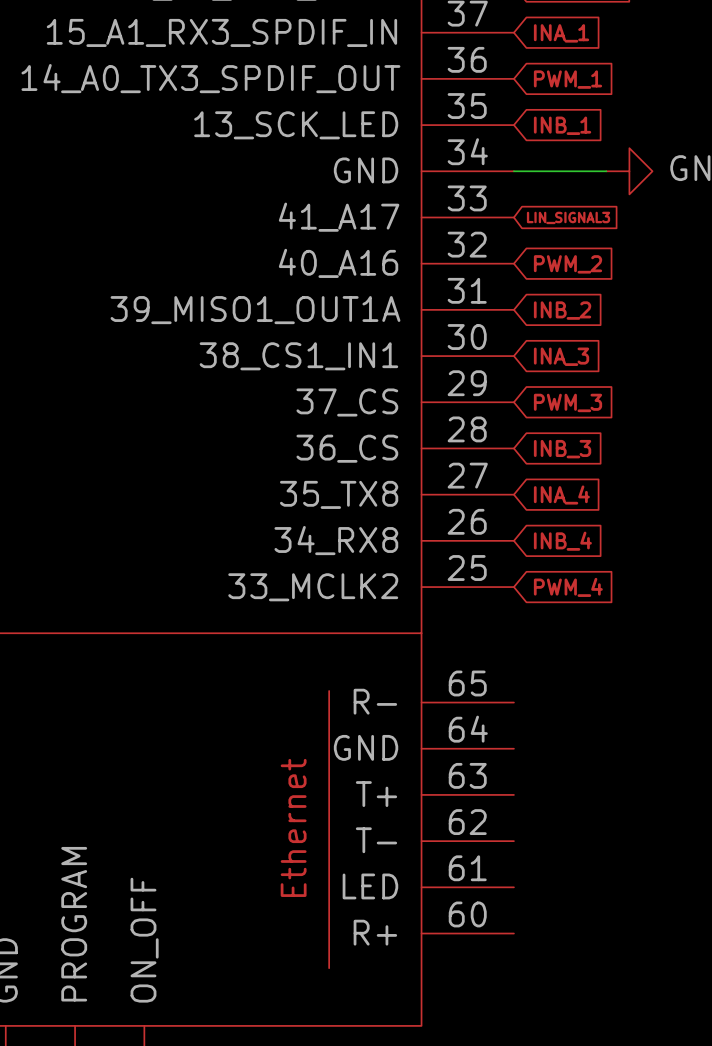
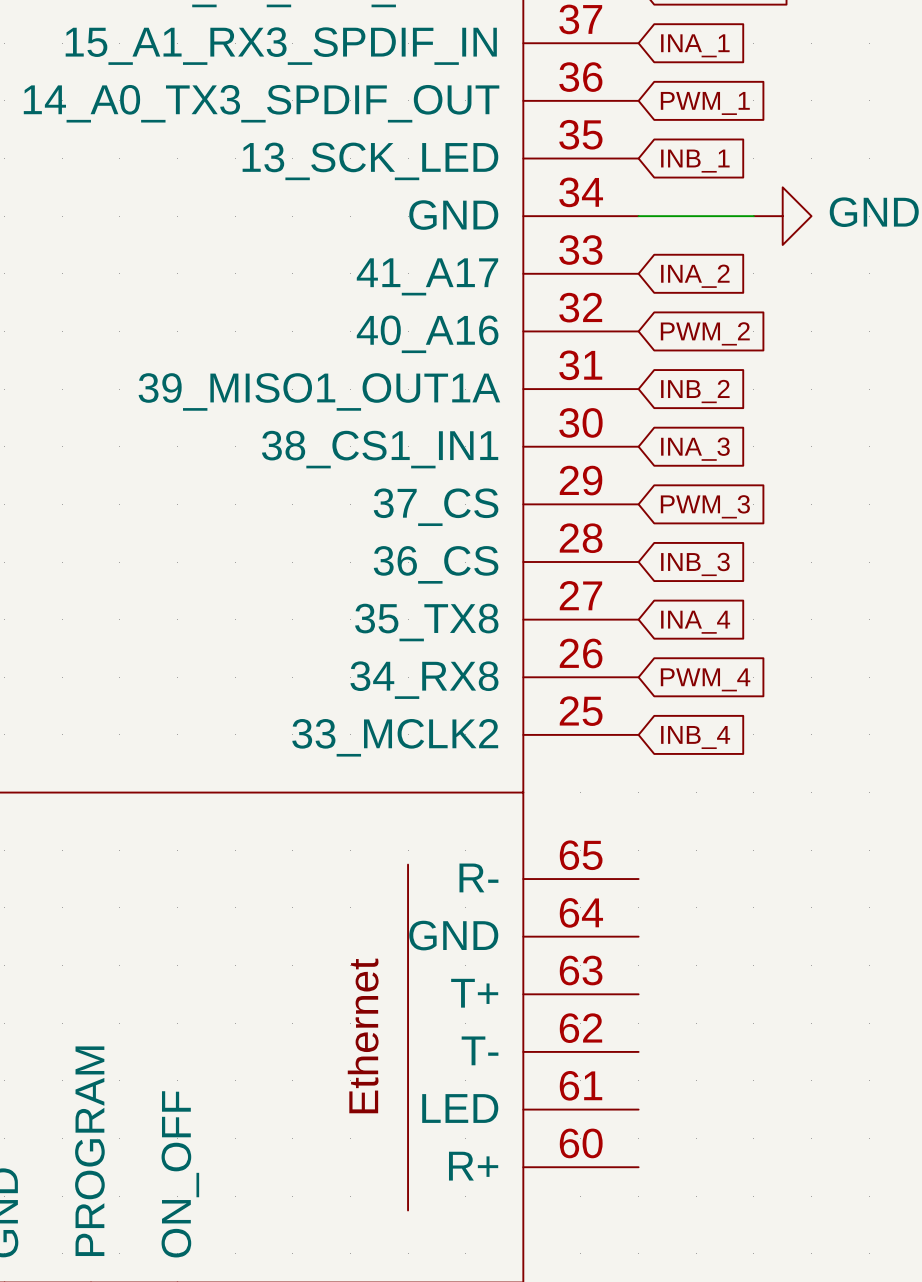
global label: LIN_SIGNAL3 (568, 217) -> INA_2 (695, 276)
global label: INB_4 (562, 541) -> PWM_4 (705, 679)
global label: PWM_4 (568, 587) -> INB_4 (695, 737)

